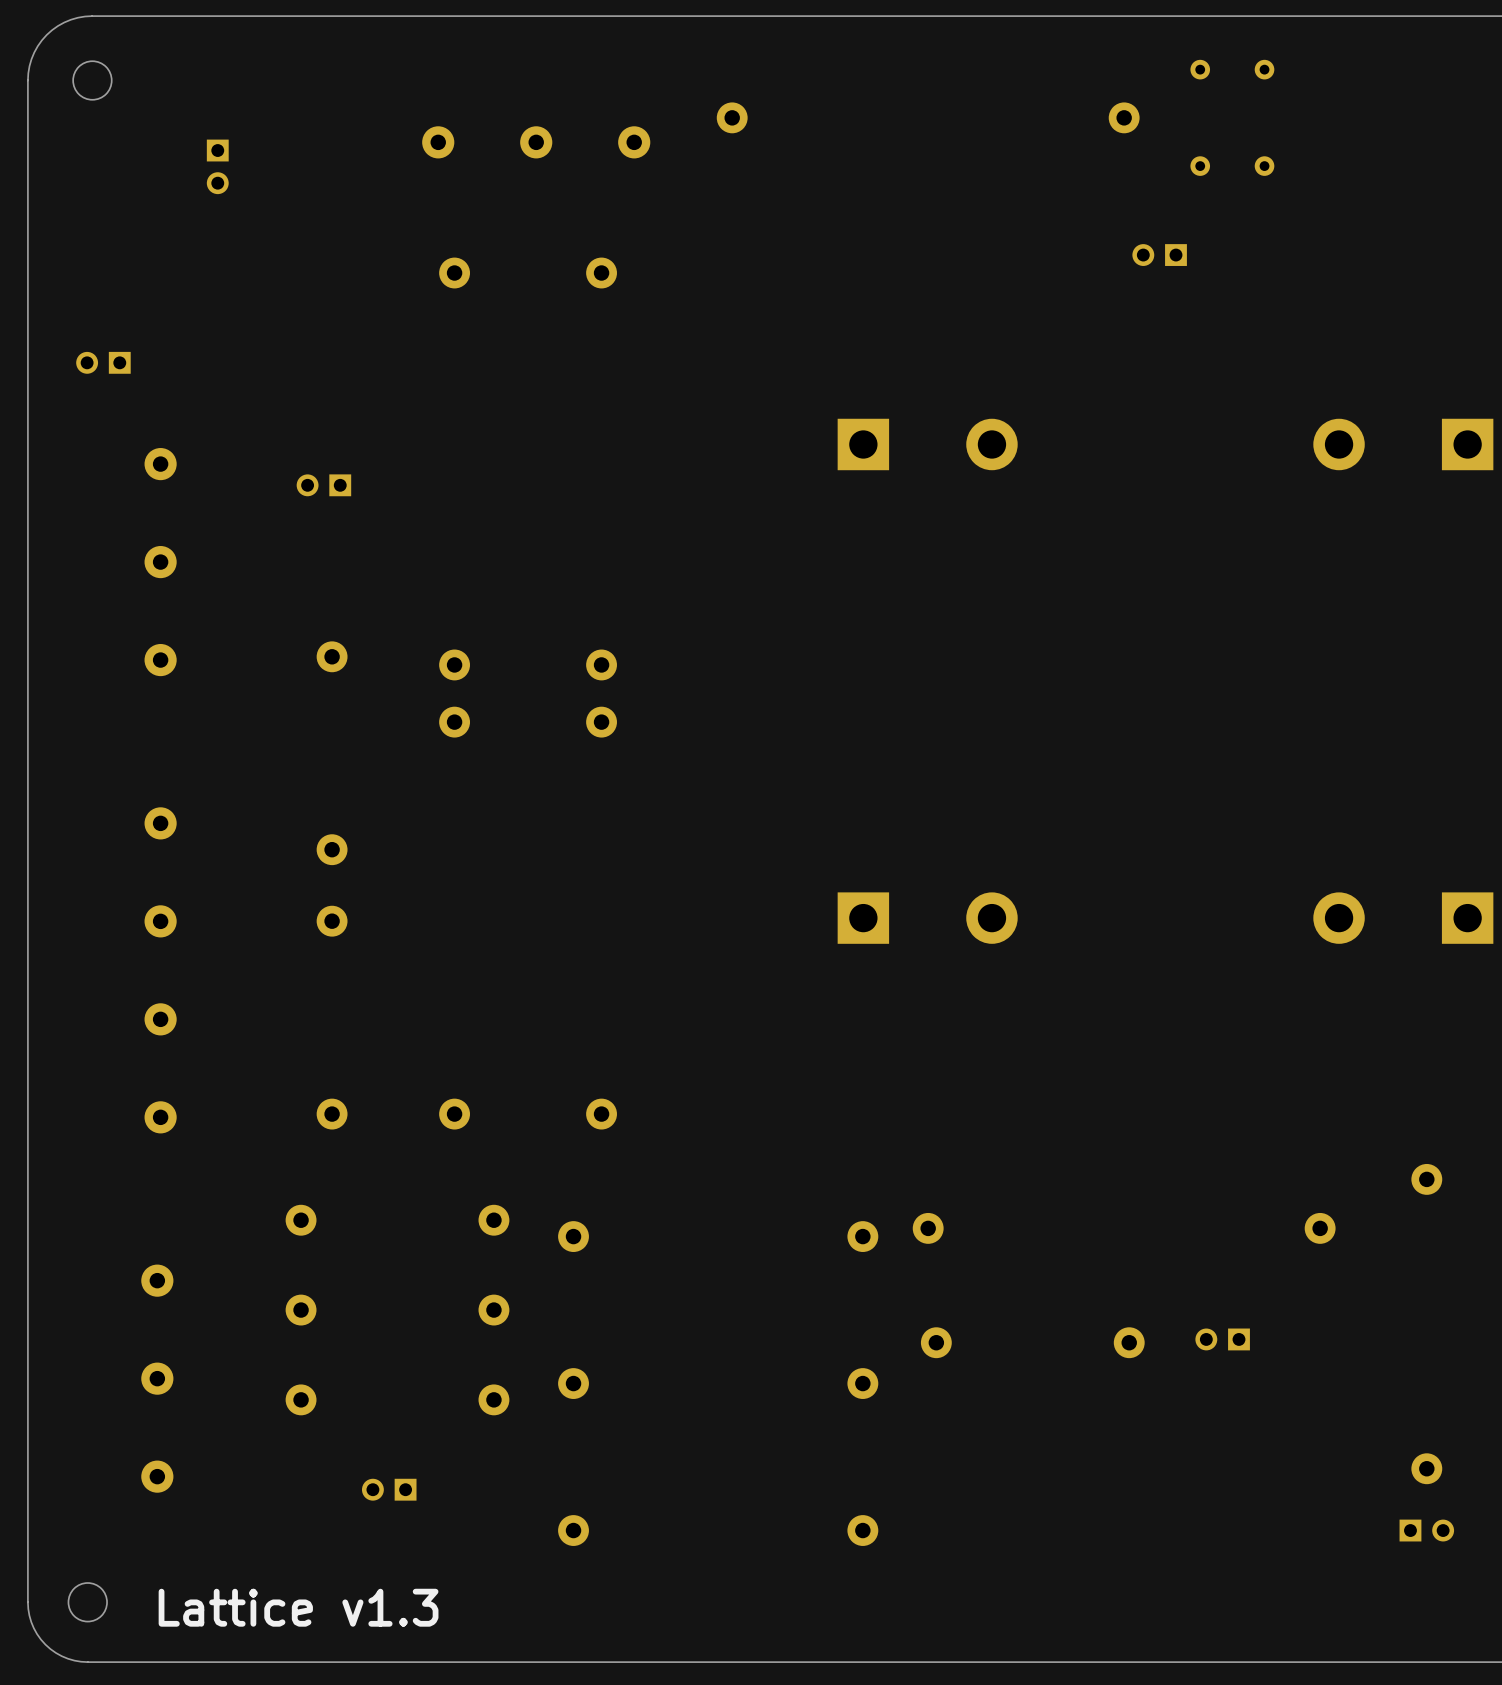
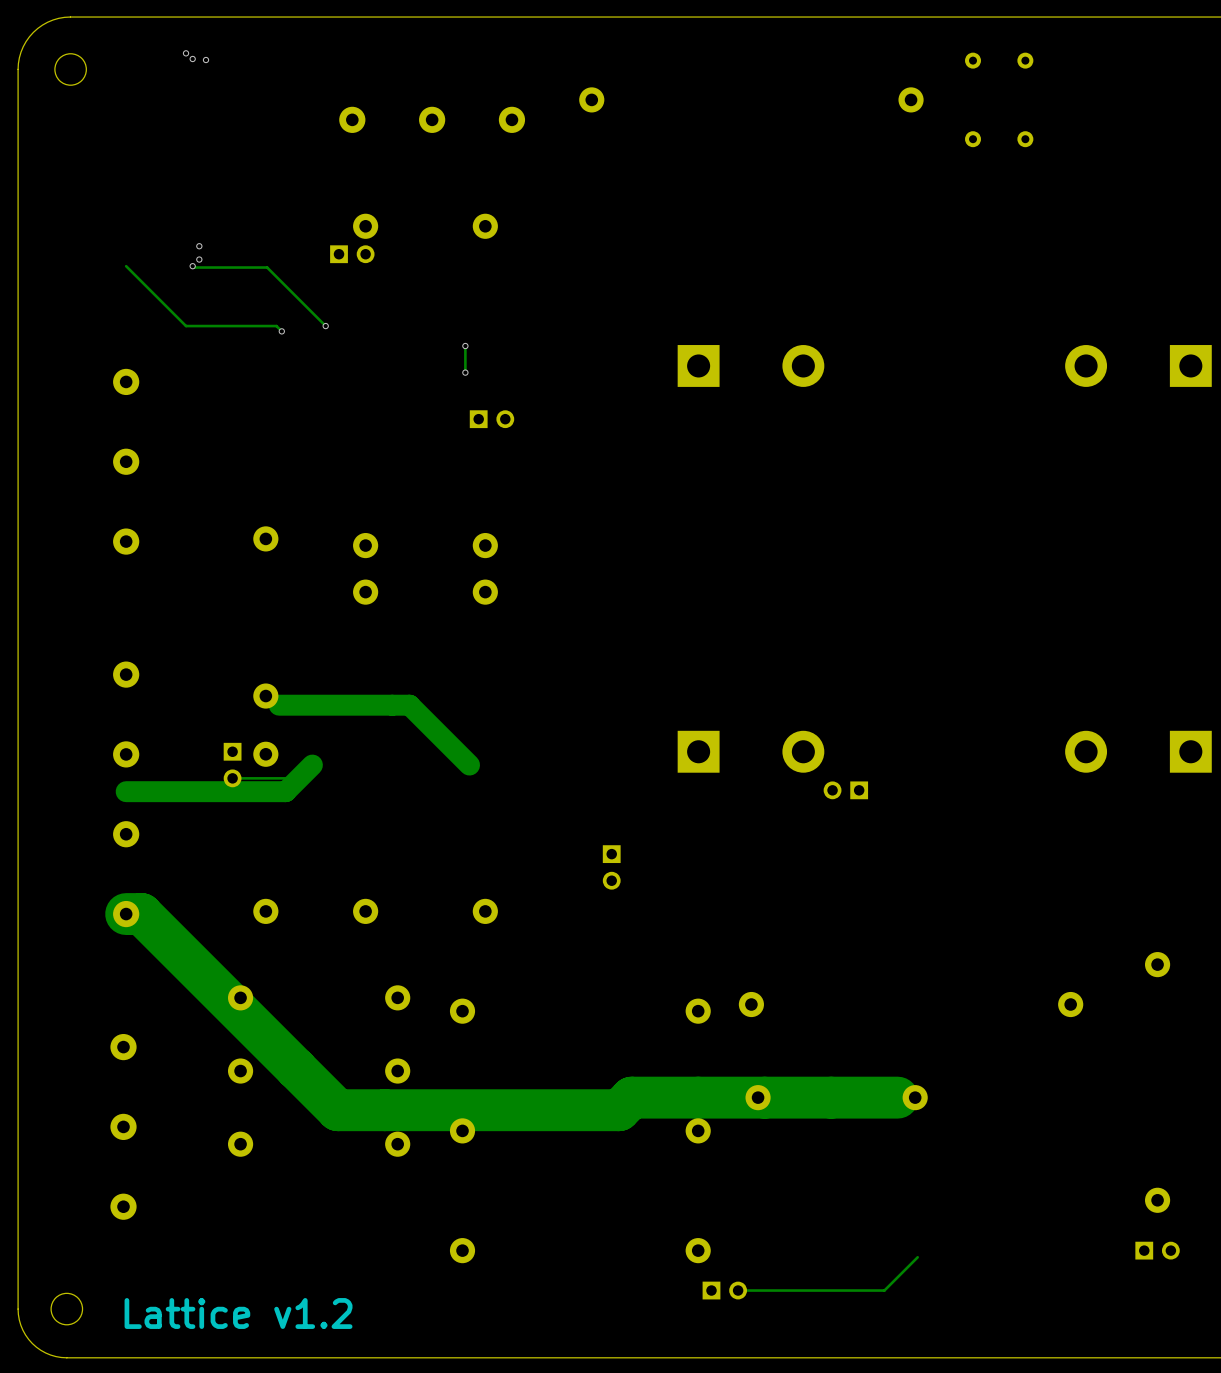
via: none -> (186, 53)
via: none -> (192, 58)
via: none -> (205, 60)
part: (217, 166) -> none
part: (1159, 255) -> none
via: none -> (199, 246)
part: none -> (352, 254)
via: none -> (199, 259)
track: none -> (126, 266) (186, 326) (276, 326) (281, 331)
track: none -> (192, 266) (267, 267) (325, 326)
via: none -> (192, 266)
part: (103, 362) -> none
via: none -> (325, 326)
via: none -> (281, 331)
track: none -> (465, 346) (465, 372)
via: none -> (465, 346)
via: none -> (465, 372)
part: (323, 485) -> none
part: none -> (492, 419)
track: none -> (279, 705) (409, 705) (469, 765)
part: none -> (232, 765)
track: none -> (232, 778) (299, 778) (312, 765) (285, 791) (126, 791)
part: none -> (845, 790)
part: none -> (611, 867)
track: none -> (126, 914) (141, 914) (337, 1110) (619, 1110) (631, 1097) (897, 1097)
part: (1222, 1339) -> none
part: (389, 1489) -> none
track: none -> (917, 1257) (884, 1290) (738, 1290)
part: none -> (724, 1290)
text: Lattice v1.3 (298, 1607) -> Lattice v1.2 (238, 1313)

